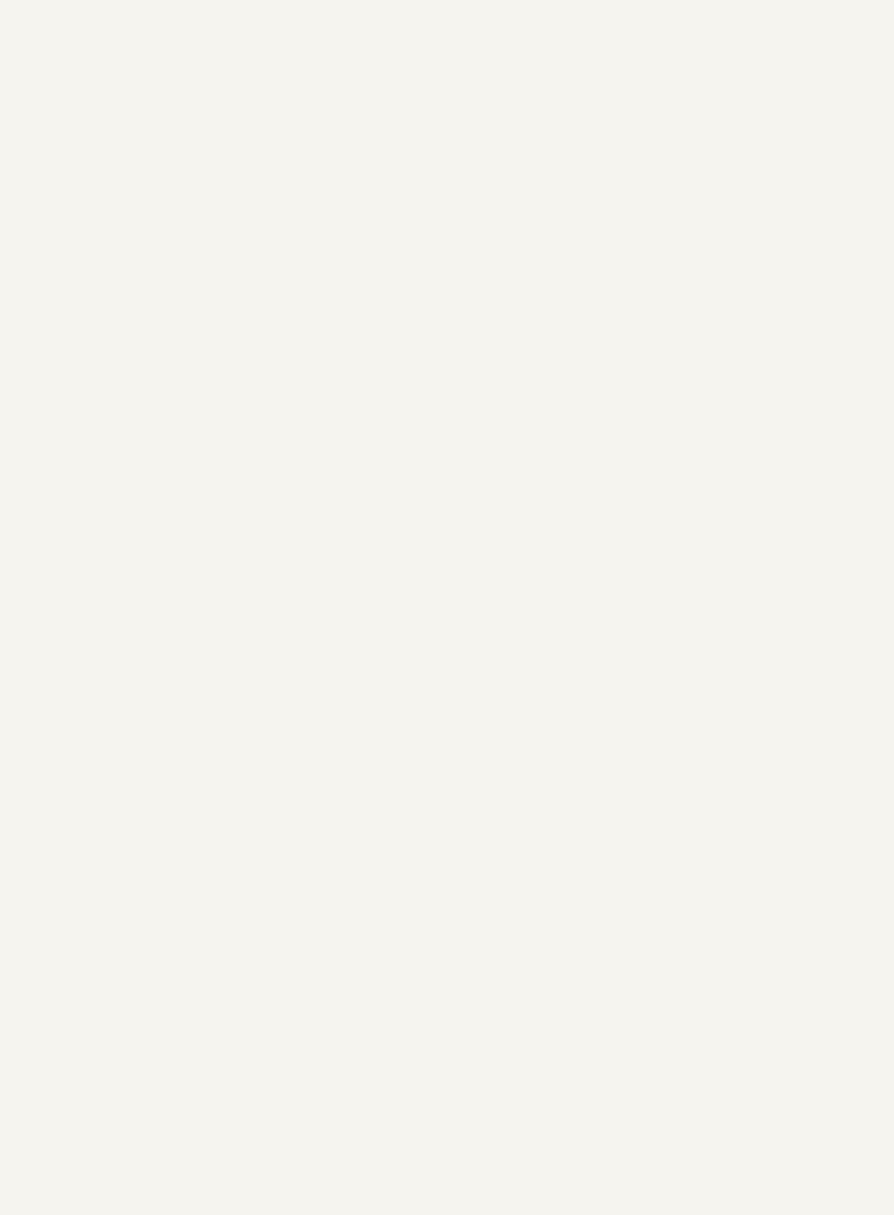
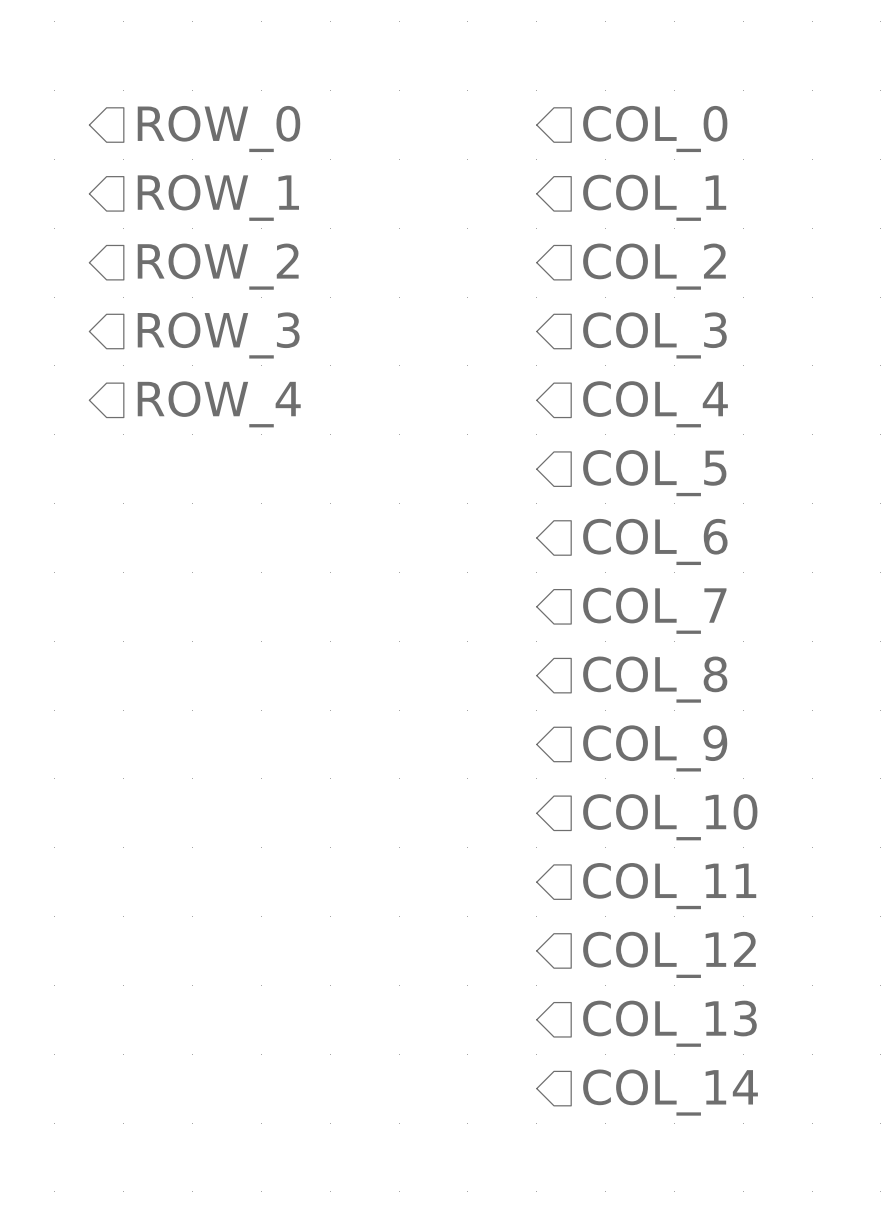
hierarchical label: none -> ROW_0 (218, 128)
hierarchical label: none -> COL_0 (655, 128)
hierarchical label: none -> ROW_1 (218, 197)
hierarchical label: none -> COL_1 (654, 197)
hierarchical label: none -> ROW_2 (218, 266)
hierarchical label: none -> COL_2 (654, 266)
hierarchical label: none -> ROW_3 (218, 335)
hierarchical label: none -> COL_3 (654, 335)
hierarchical label: none -> ROW_4 (219, 404)
hierarchical label: none -> COL_4 (655, 404)
hierarchical label: none -> COL_5 (654, 473)
hierarchical label: none -> COL_6 (655, 541)
hierarchical label: none -> COL_7 (654, 610)
hierarchical label: none -> COL_8 (655, 679)
hierarchical label: none -> COL_9 (655, 748)
hierarchical label: none -> COL_10 (670, 817)
hierarchical label: none -> COL_11 (669, 886)
hierarchical label: none -> COL_12 (669, 954)
hierarchical label: none -> COL_13 (669, 1023)
hierarchical label: none -> COL_14 (670, 1092)

